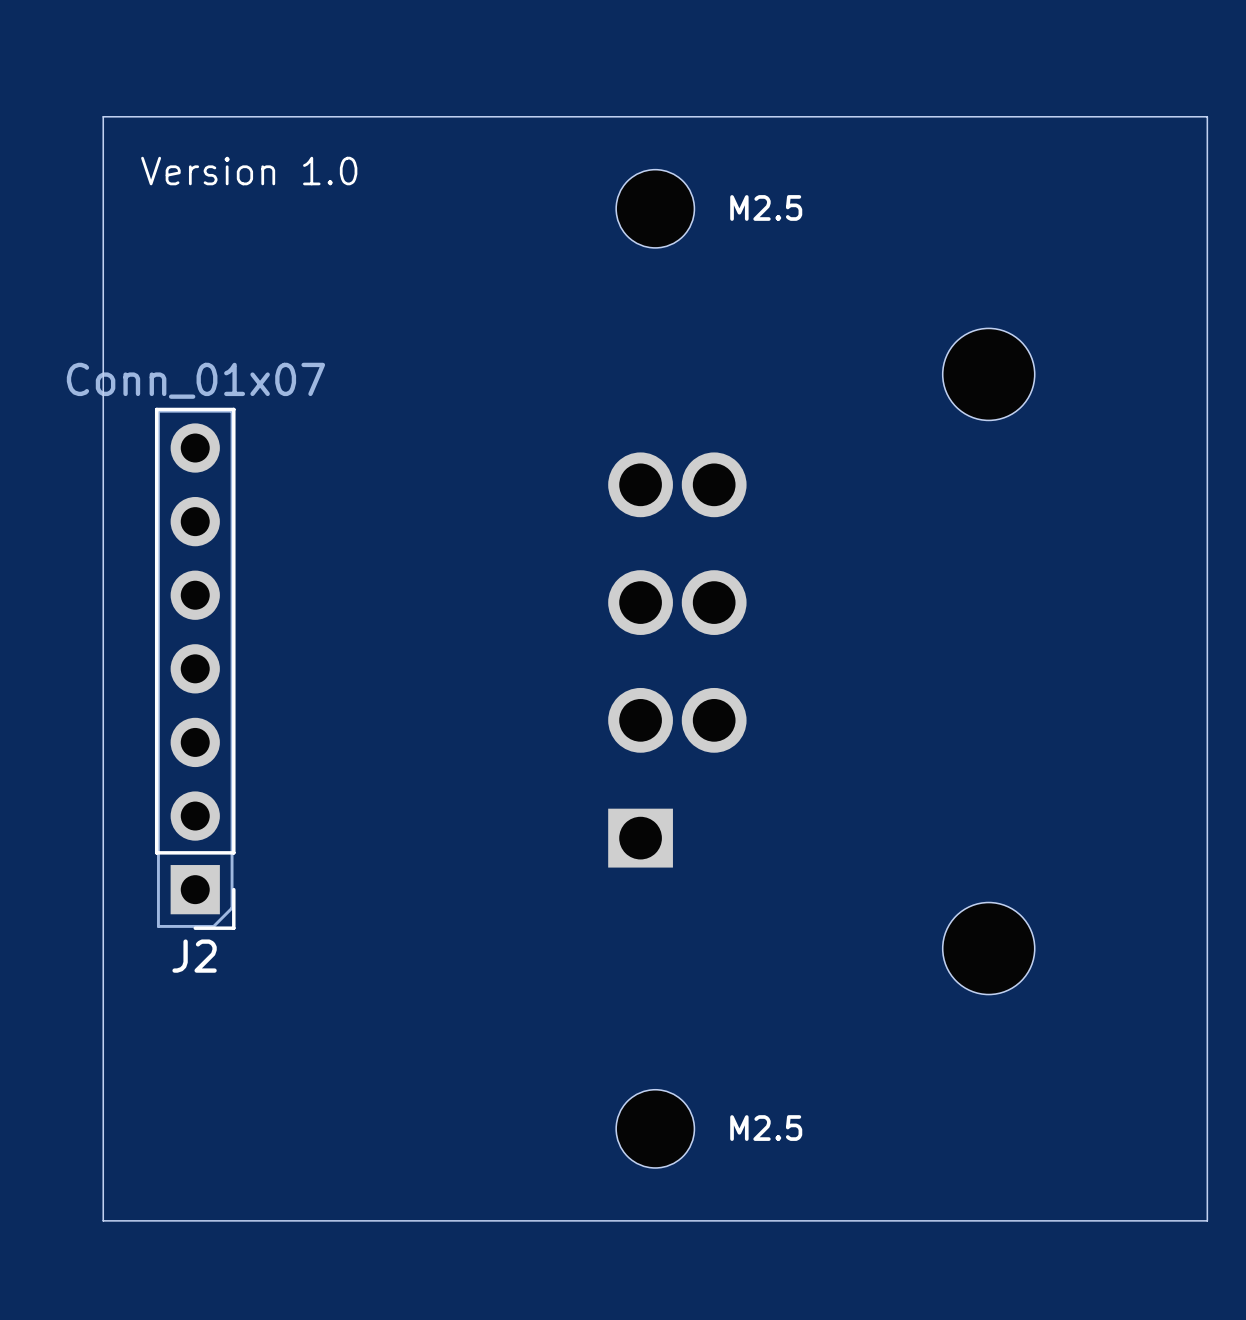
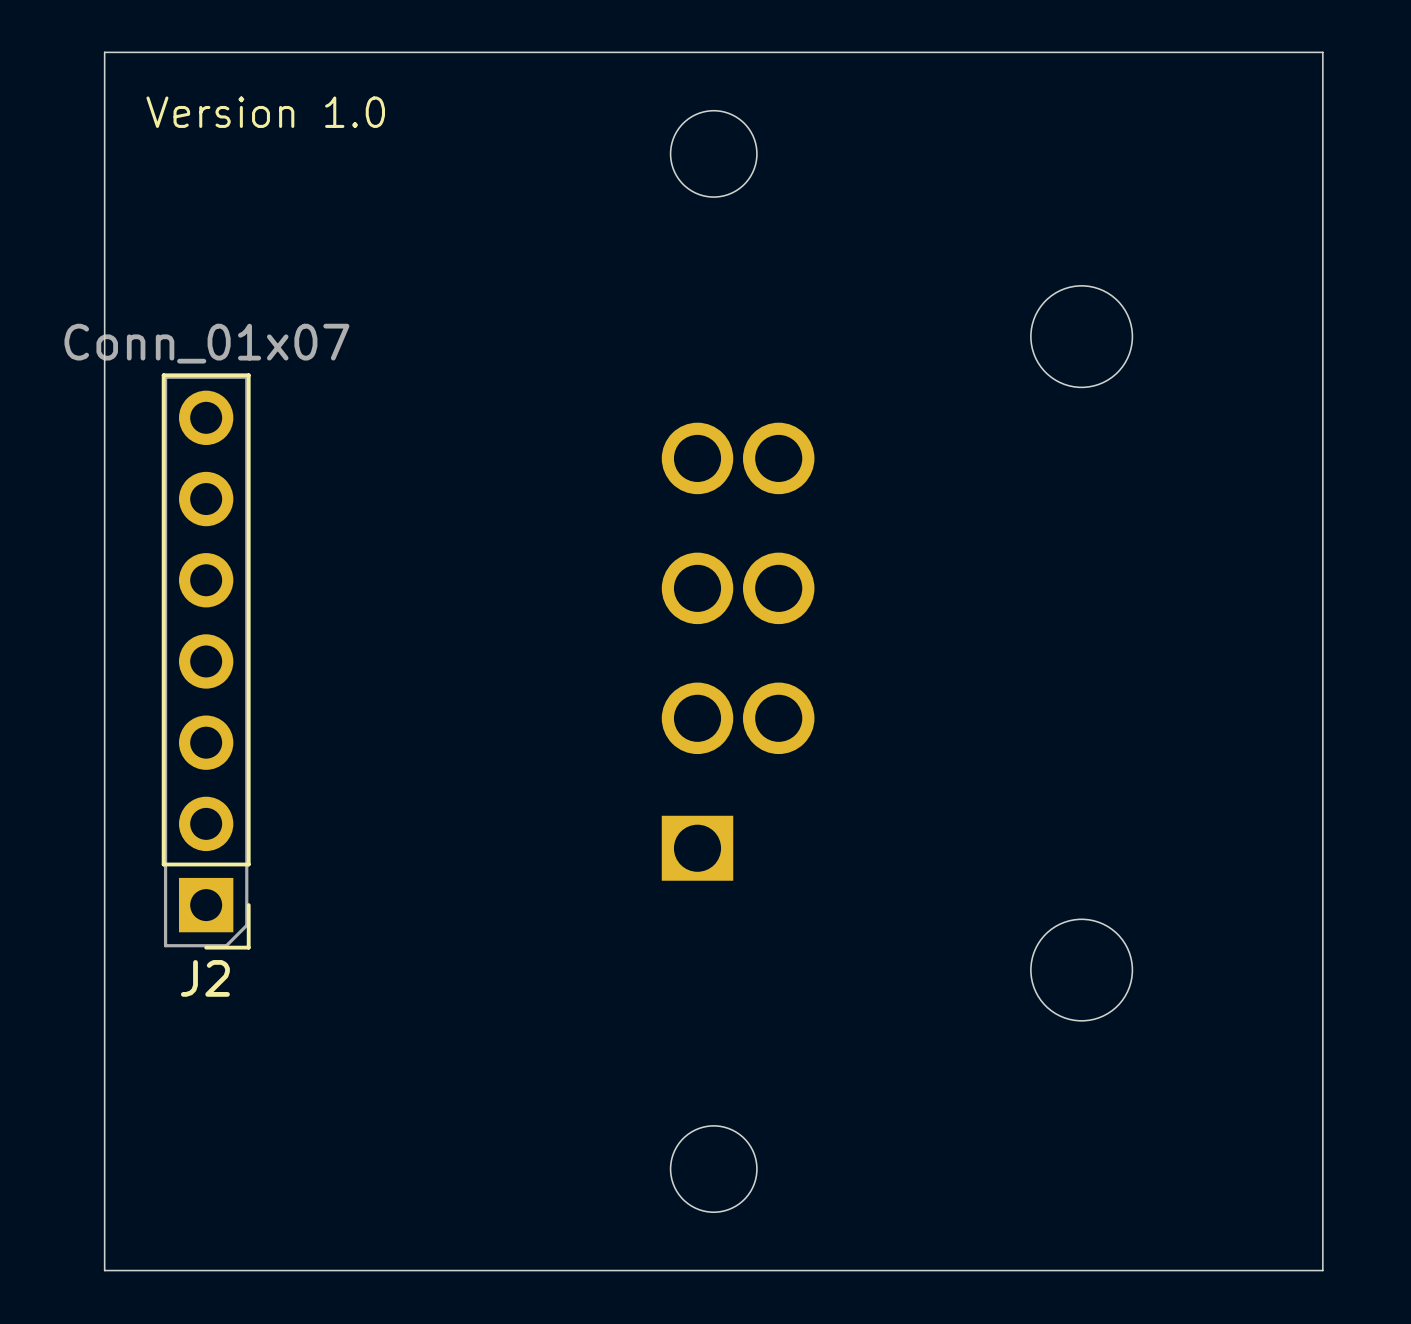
text: M2.5 (766, 207) -> none
text: M2.5 (766, 1128) -> none

